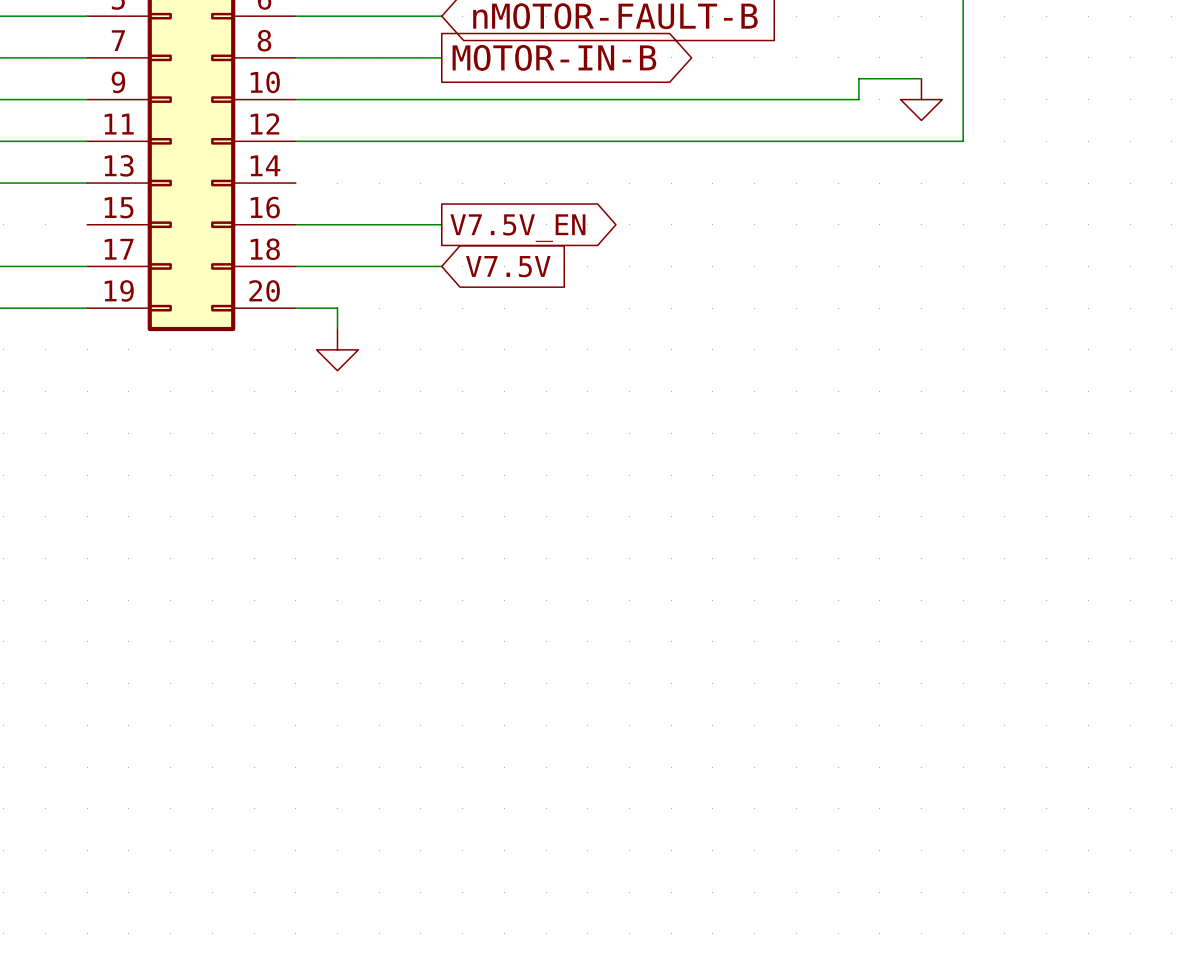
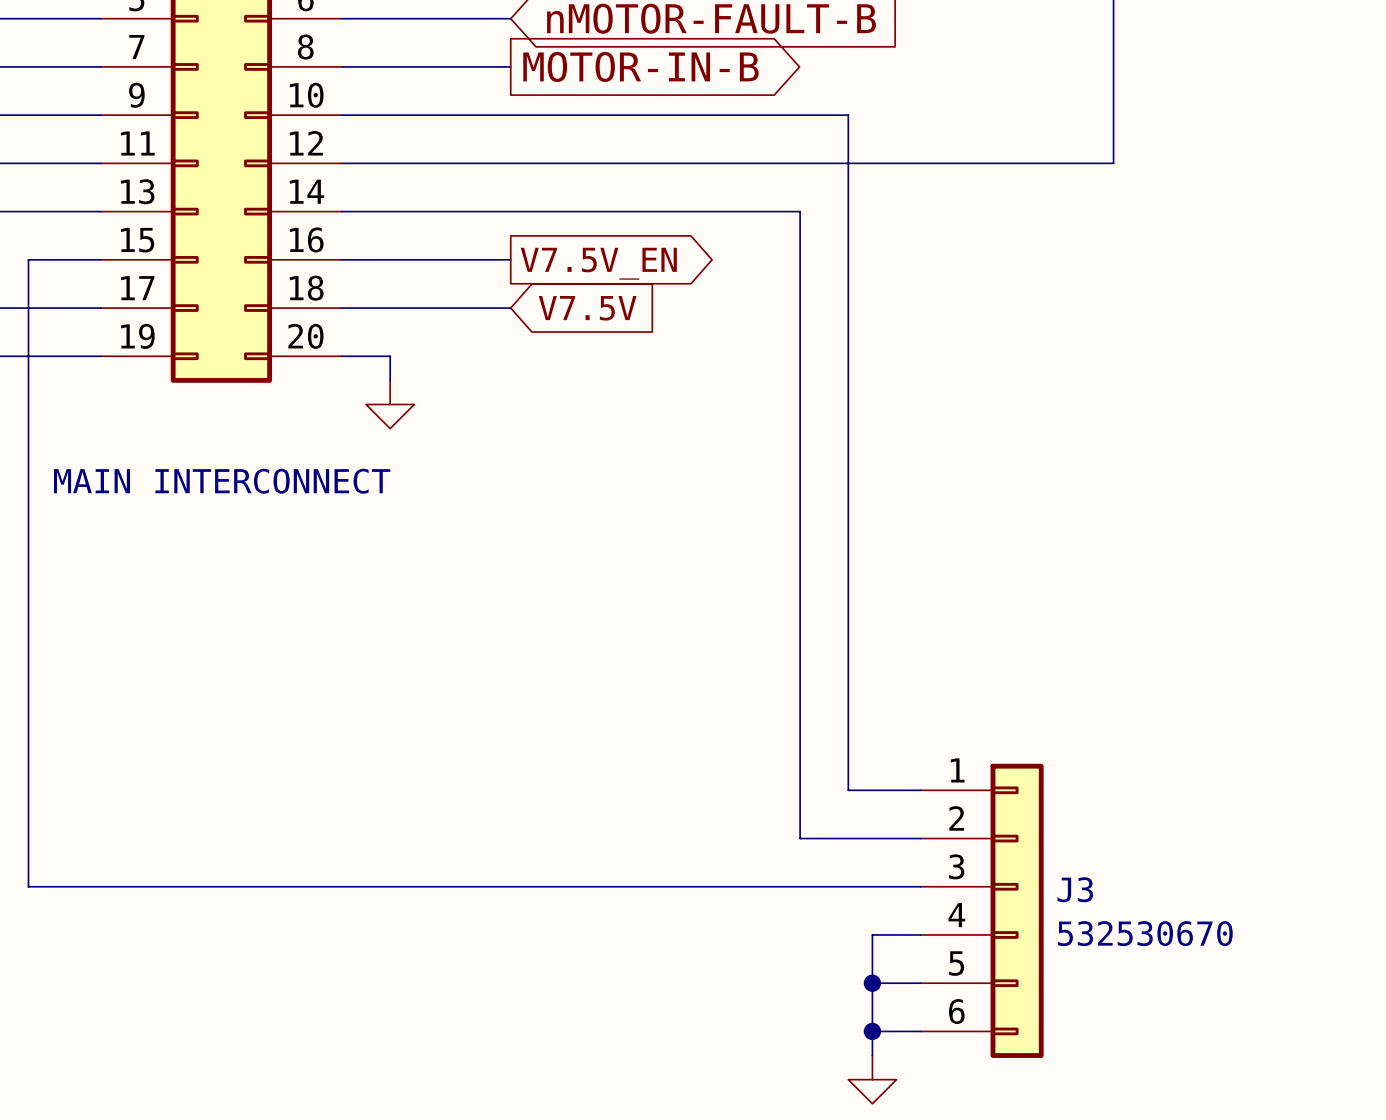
wire: (921, 78) (858, 78) (858, 99) (733, 99) -> (920, 790) (848, 790) (848, 115)
power symbol: (921, 99) -> none
wire: none -> (341, 211) (800, 211) (800, 838) (920, 838)
wire: none -> (100, 259) (28, 259) (28, 886) (920, 886)
text: none -> MAIN INTERCONNECT (222, 481)
J3: none -> 532530670 (982, 910)
wire: none -> (920, 934) (872, 934) (872, 1055)
wire: none -> (872, 983) (920, 983)
junction: none -> (872, 983)
wire: none -> (872, 1031) (920, 1031)
junction: none -> (872, 1031)
power symbol: none -> (872, 1079)

